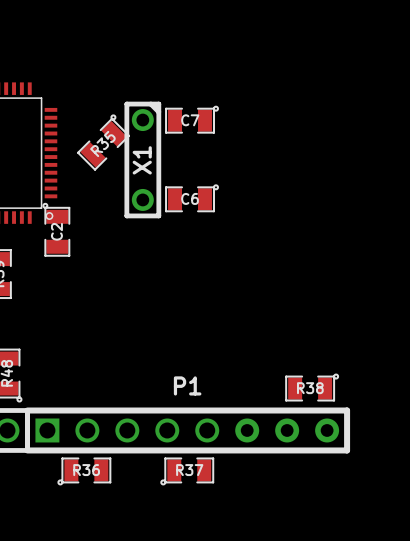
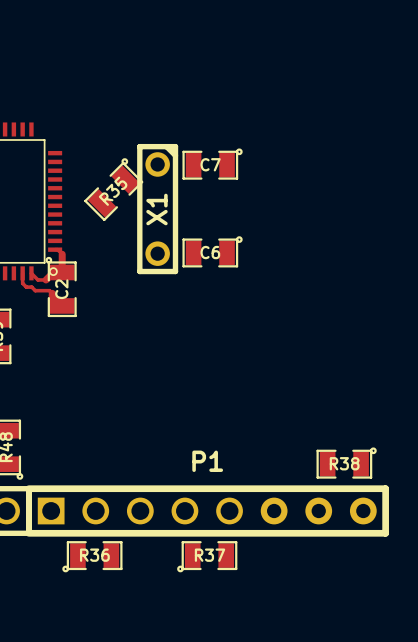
track: none -> (55, 249) (62, 254) (62, 272) (53, 272) (46, 279) (38, 279) (31, 273)
track: none -> (22, 273) (22, 283) (26, 287) (31, 287) (35, 290) (49, 290) (62, 305)

